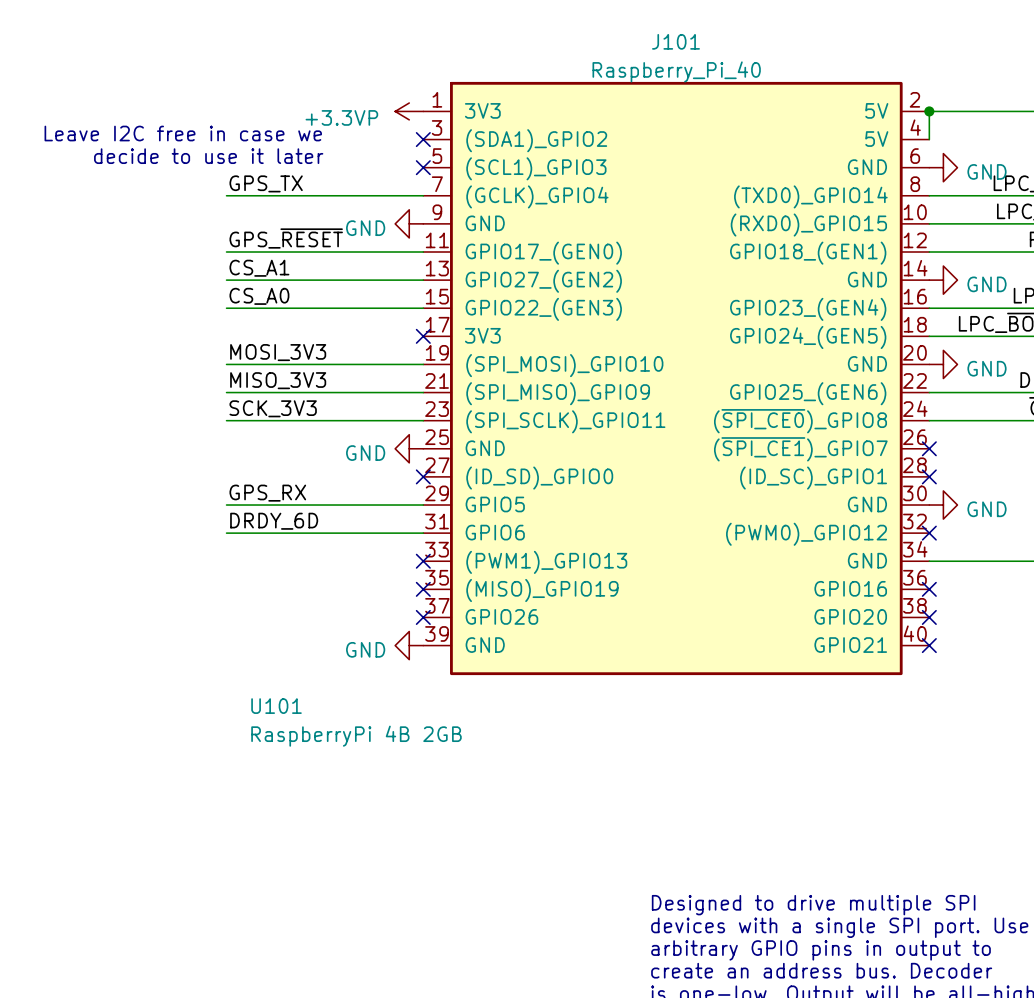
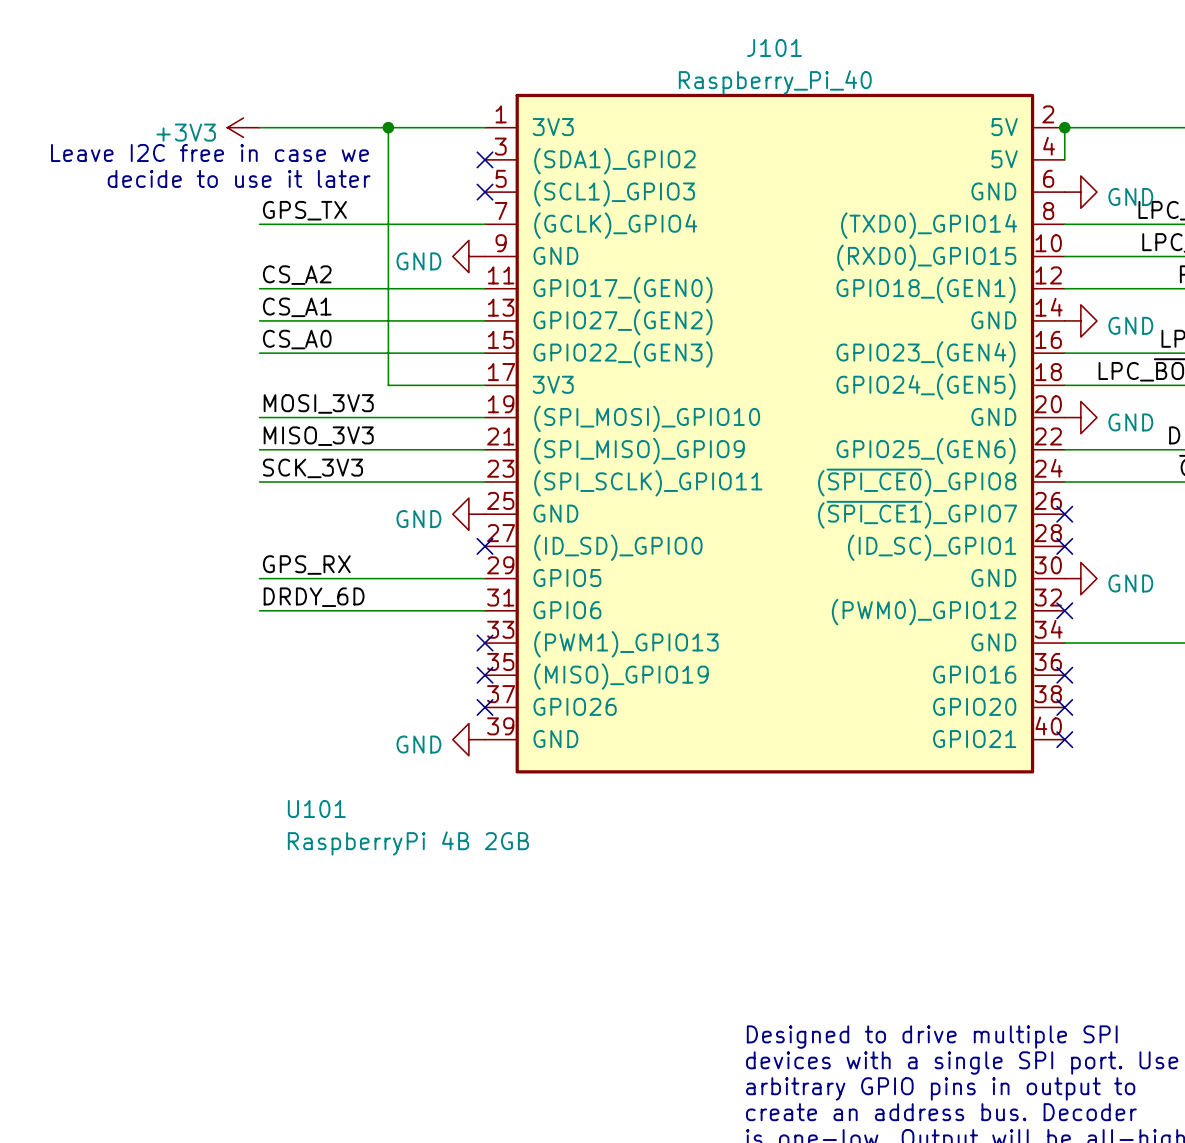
power symbol: none -> +3V3 (243, 127)
wire: none -> (259, 127) (485, 127)
wire: none -> (388, 127) (388, 385) (485, 385)
junction: none -> (388, 127)
power symbol: +3.3VP (409, 111) -> none
label: GPS_~{RESET} (286, 238) -> CS_A2 (297, 275)
no-connect mark: (423, 336) -> none

